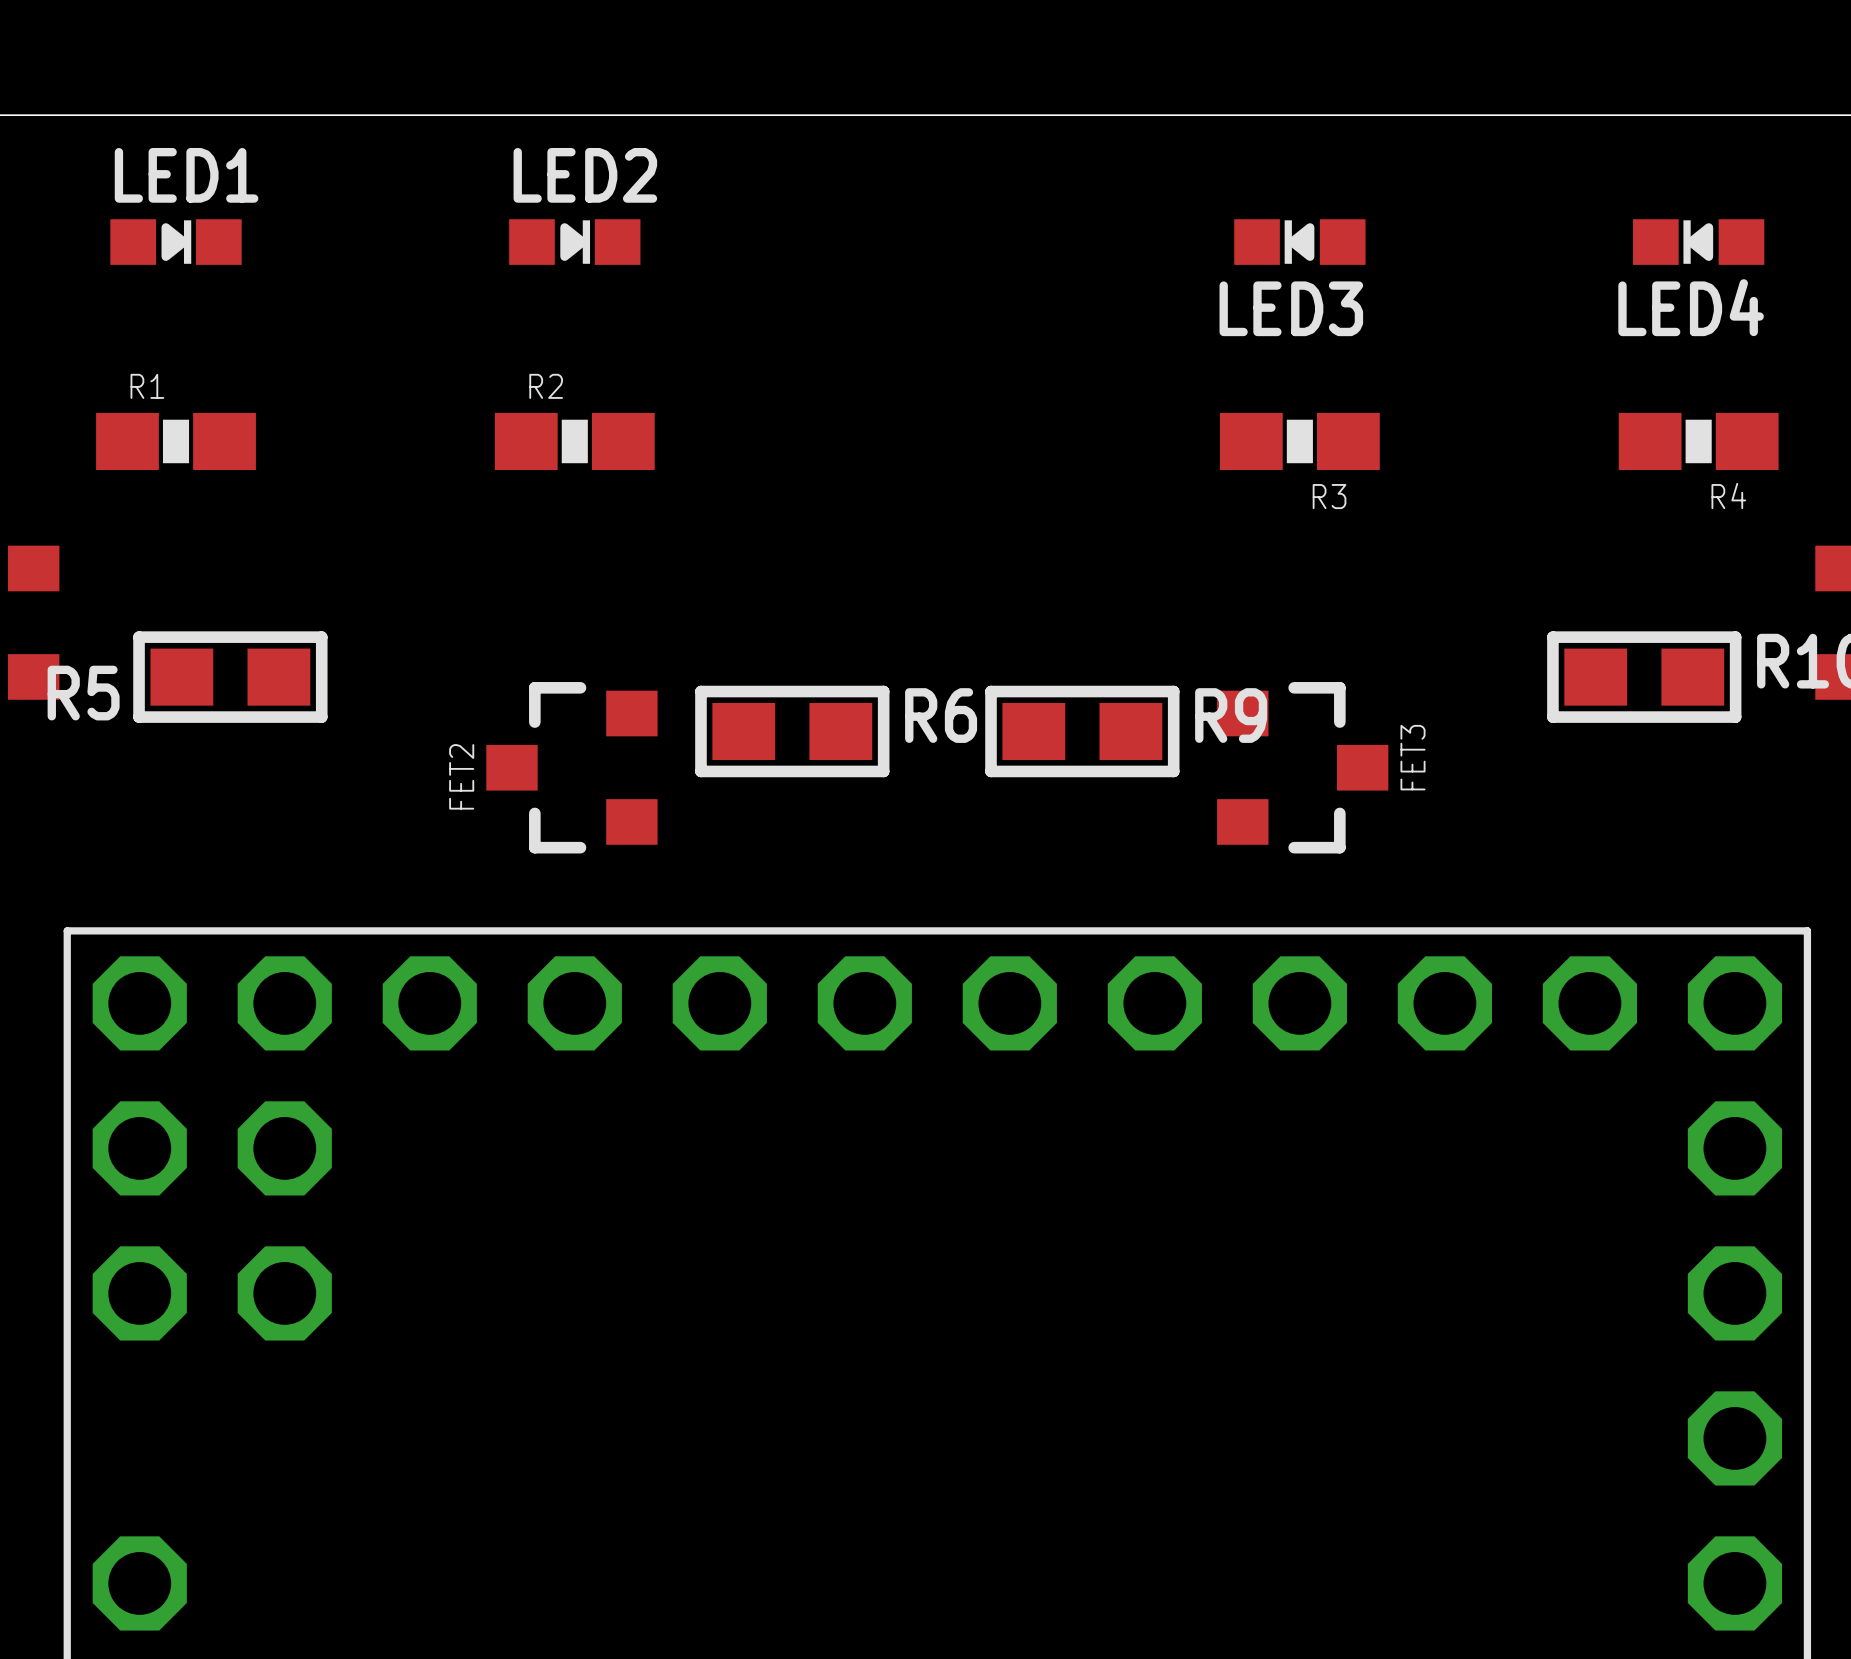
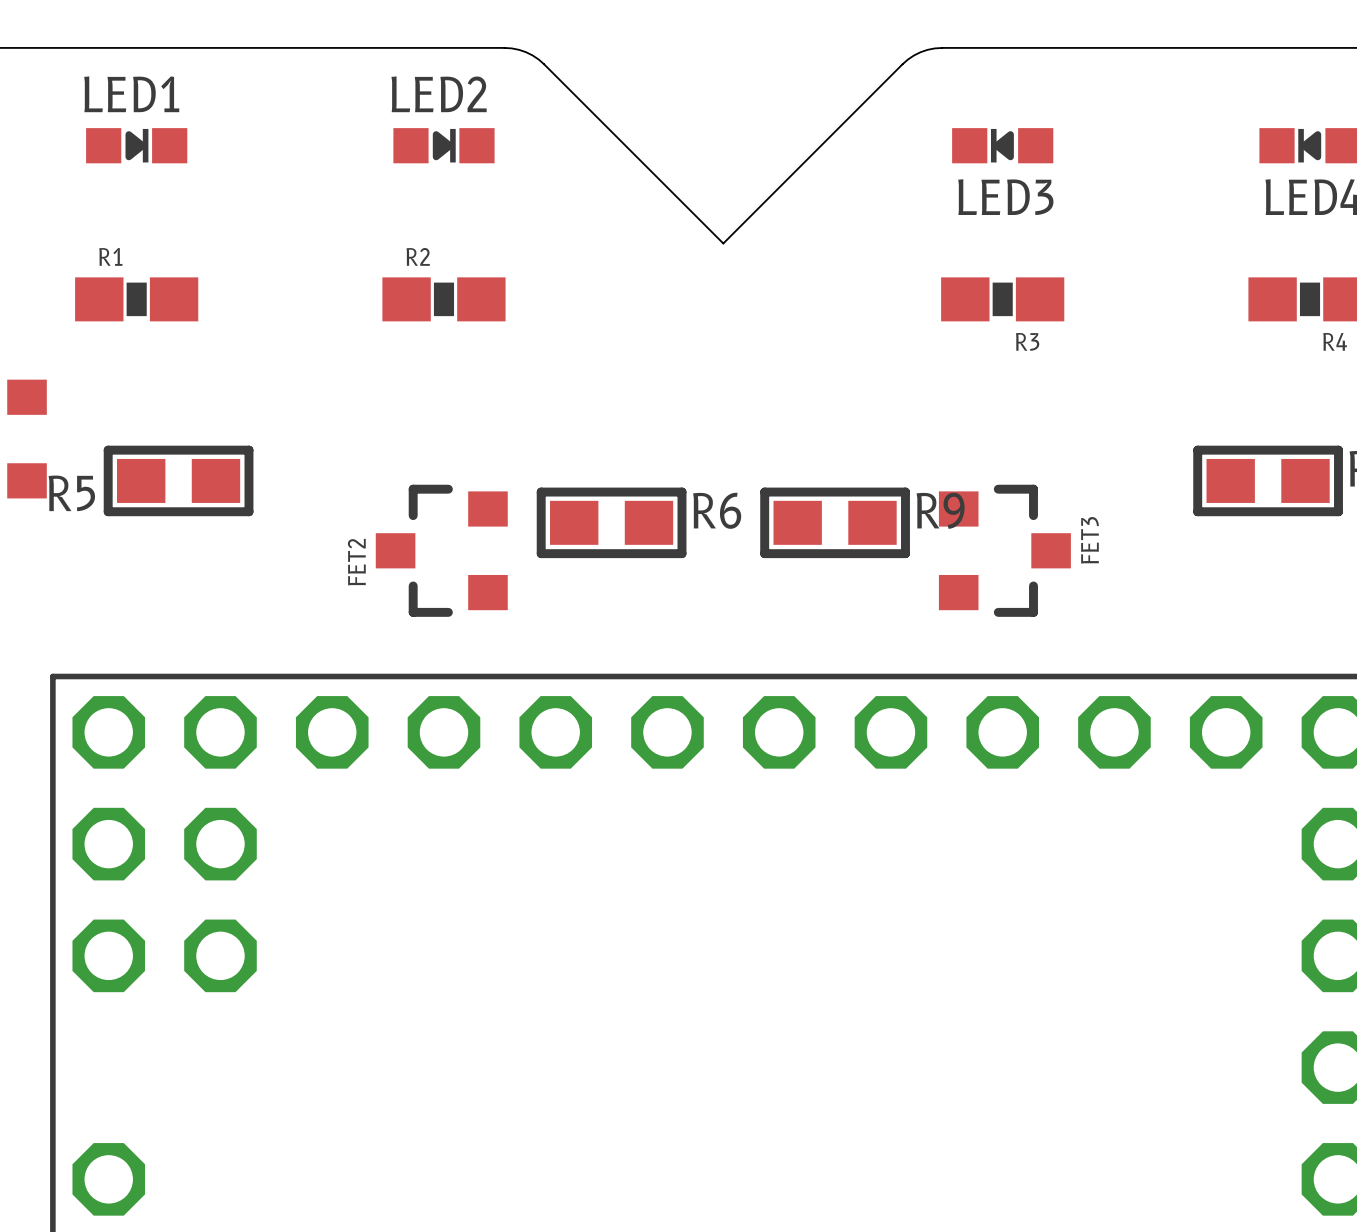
board edge: (653, 115) (1221, 115) -> (504, 47) (526, 52) (544, 64) (723, 243) (902, 64) (920, 52) (942, 47)

